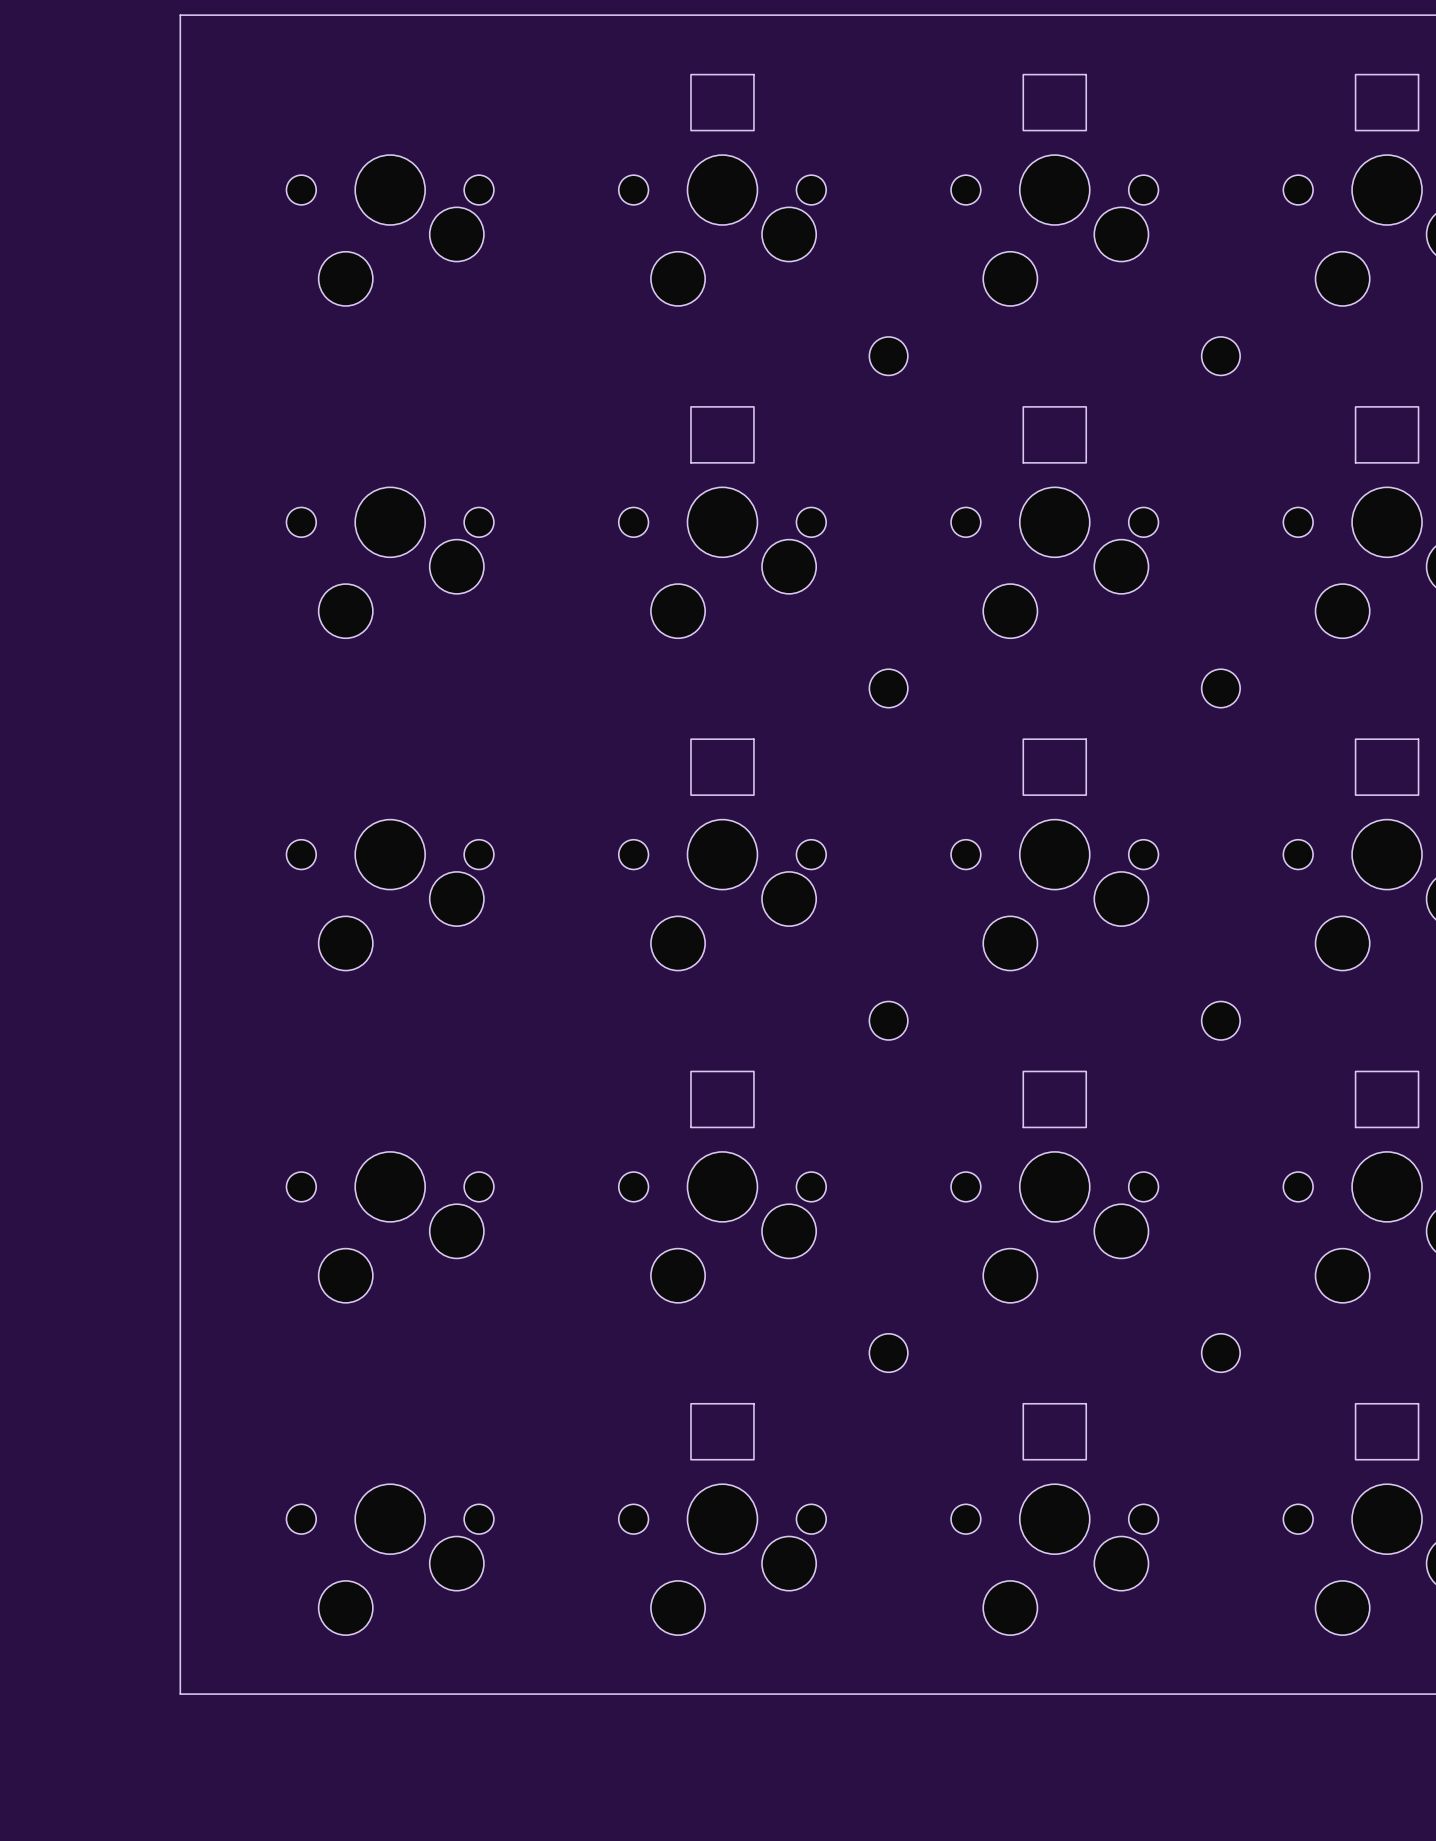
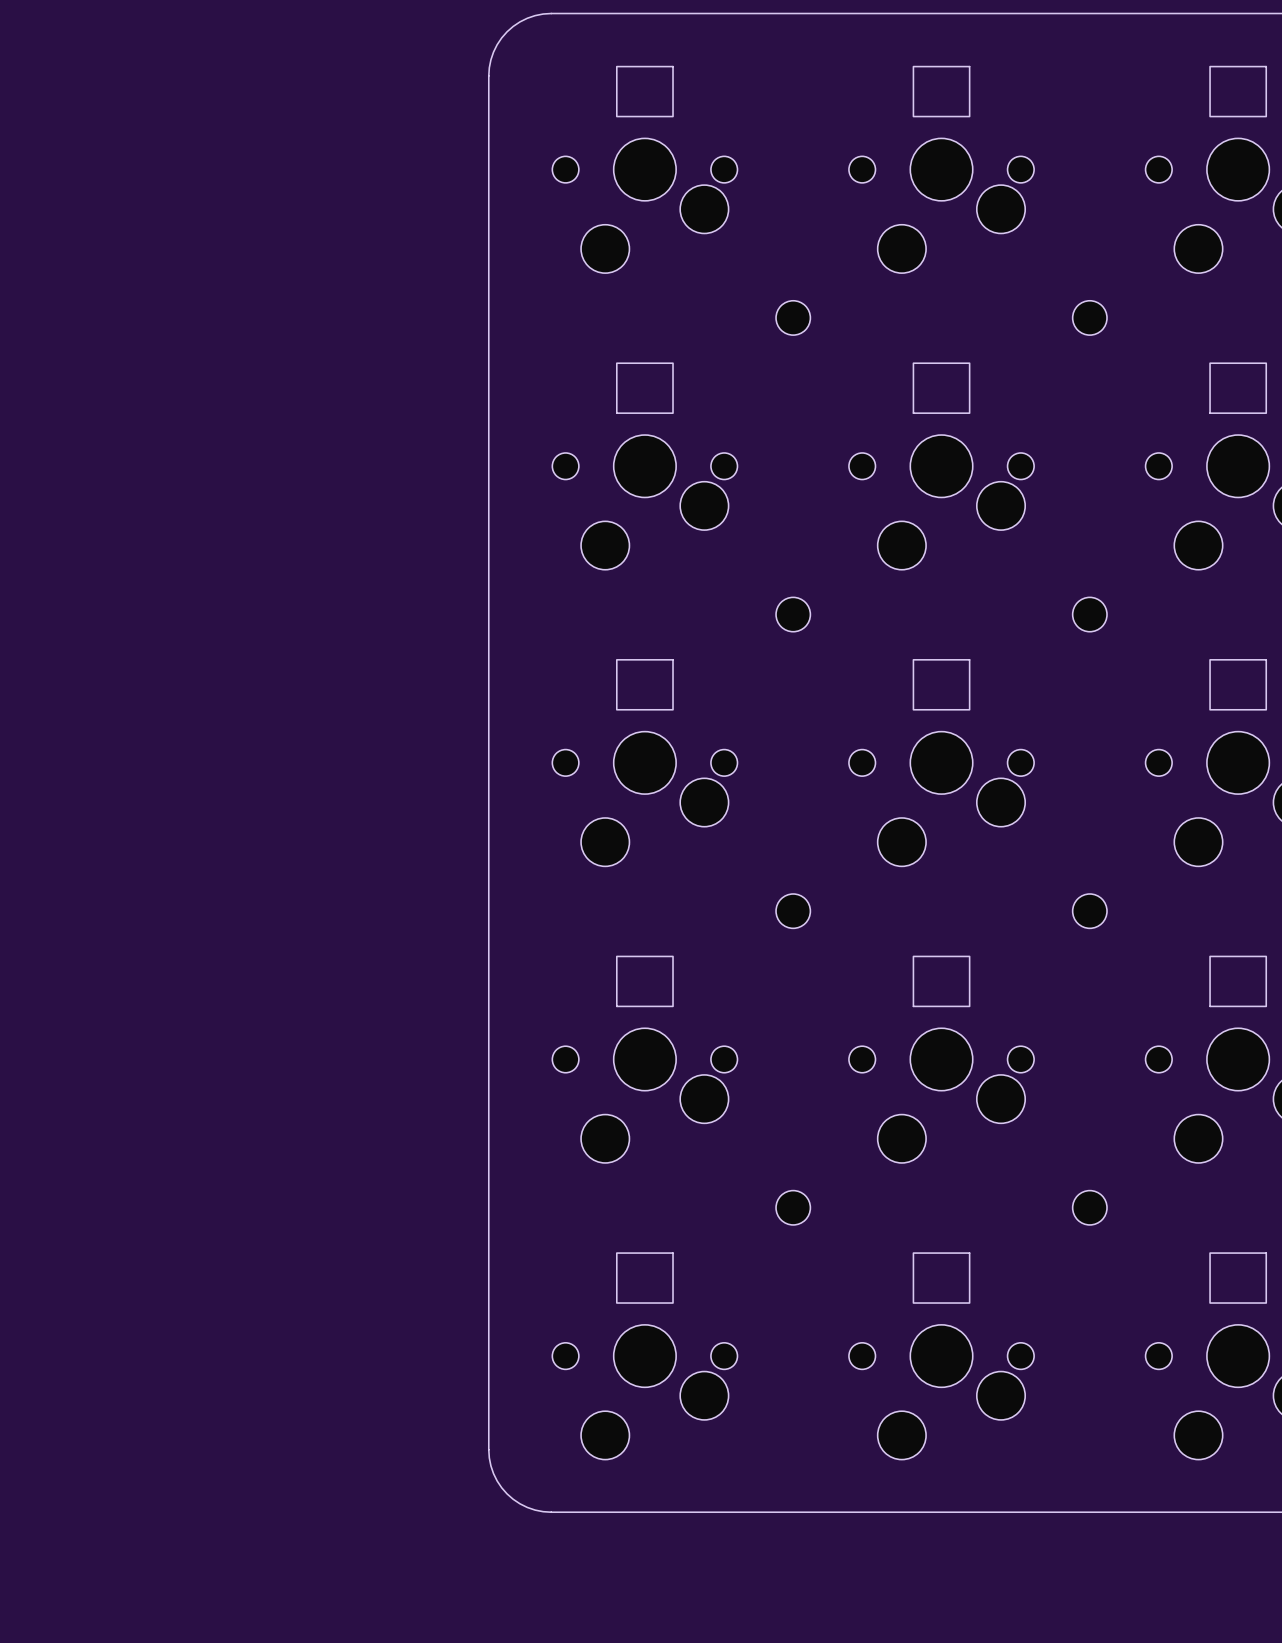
board edge: (617, 15) (180, 15) (180, 1694) (617, 1694) -> (551, 13) (527, 18) (507, 31) (493, 52) (488, 75) (488, 1449) (493, 1473) (507, 1493) (527, 1507) (551, 1512)
part: (390, 230) -> none
part: (390, 562) -> none
part: (390, 895) -> none
part: (390, 1227) -> none
part: (390, 1559) -> none

